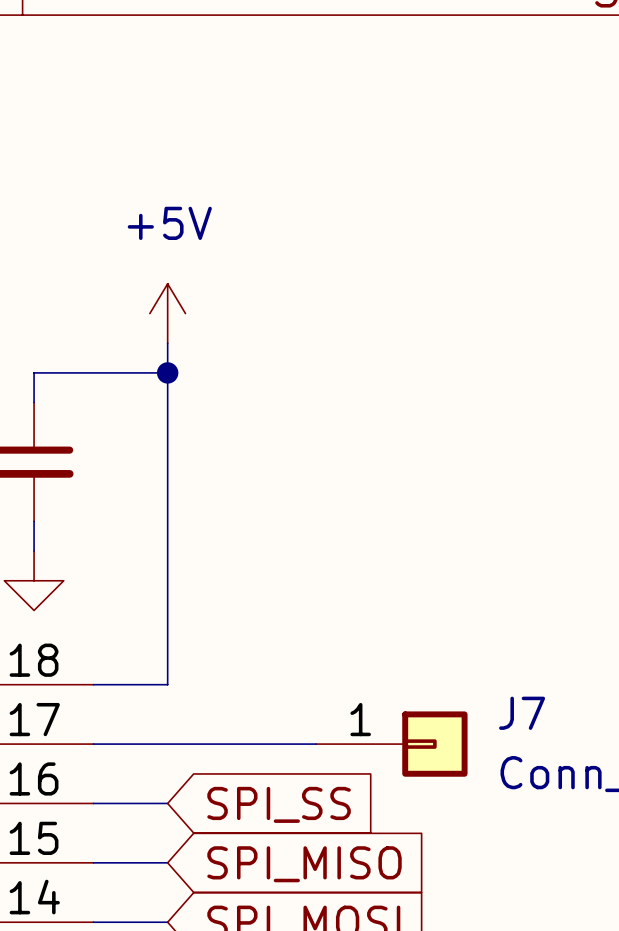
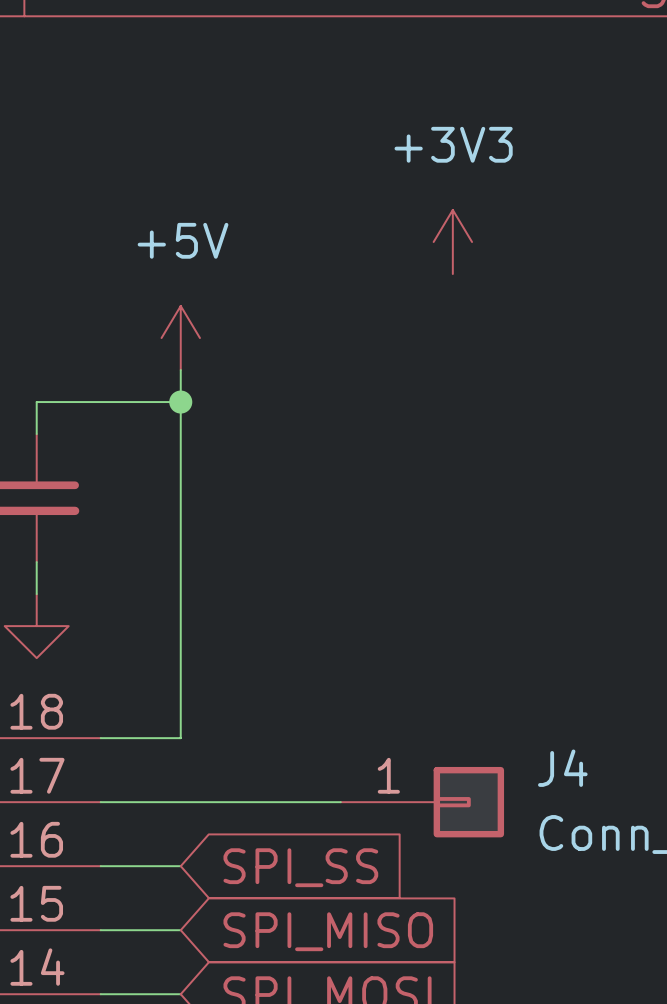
power symbol: none -> +3V3 (452, 241)
J7 name: J7 (522, 713) -> J4 (562, 768)

